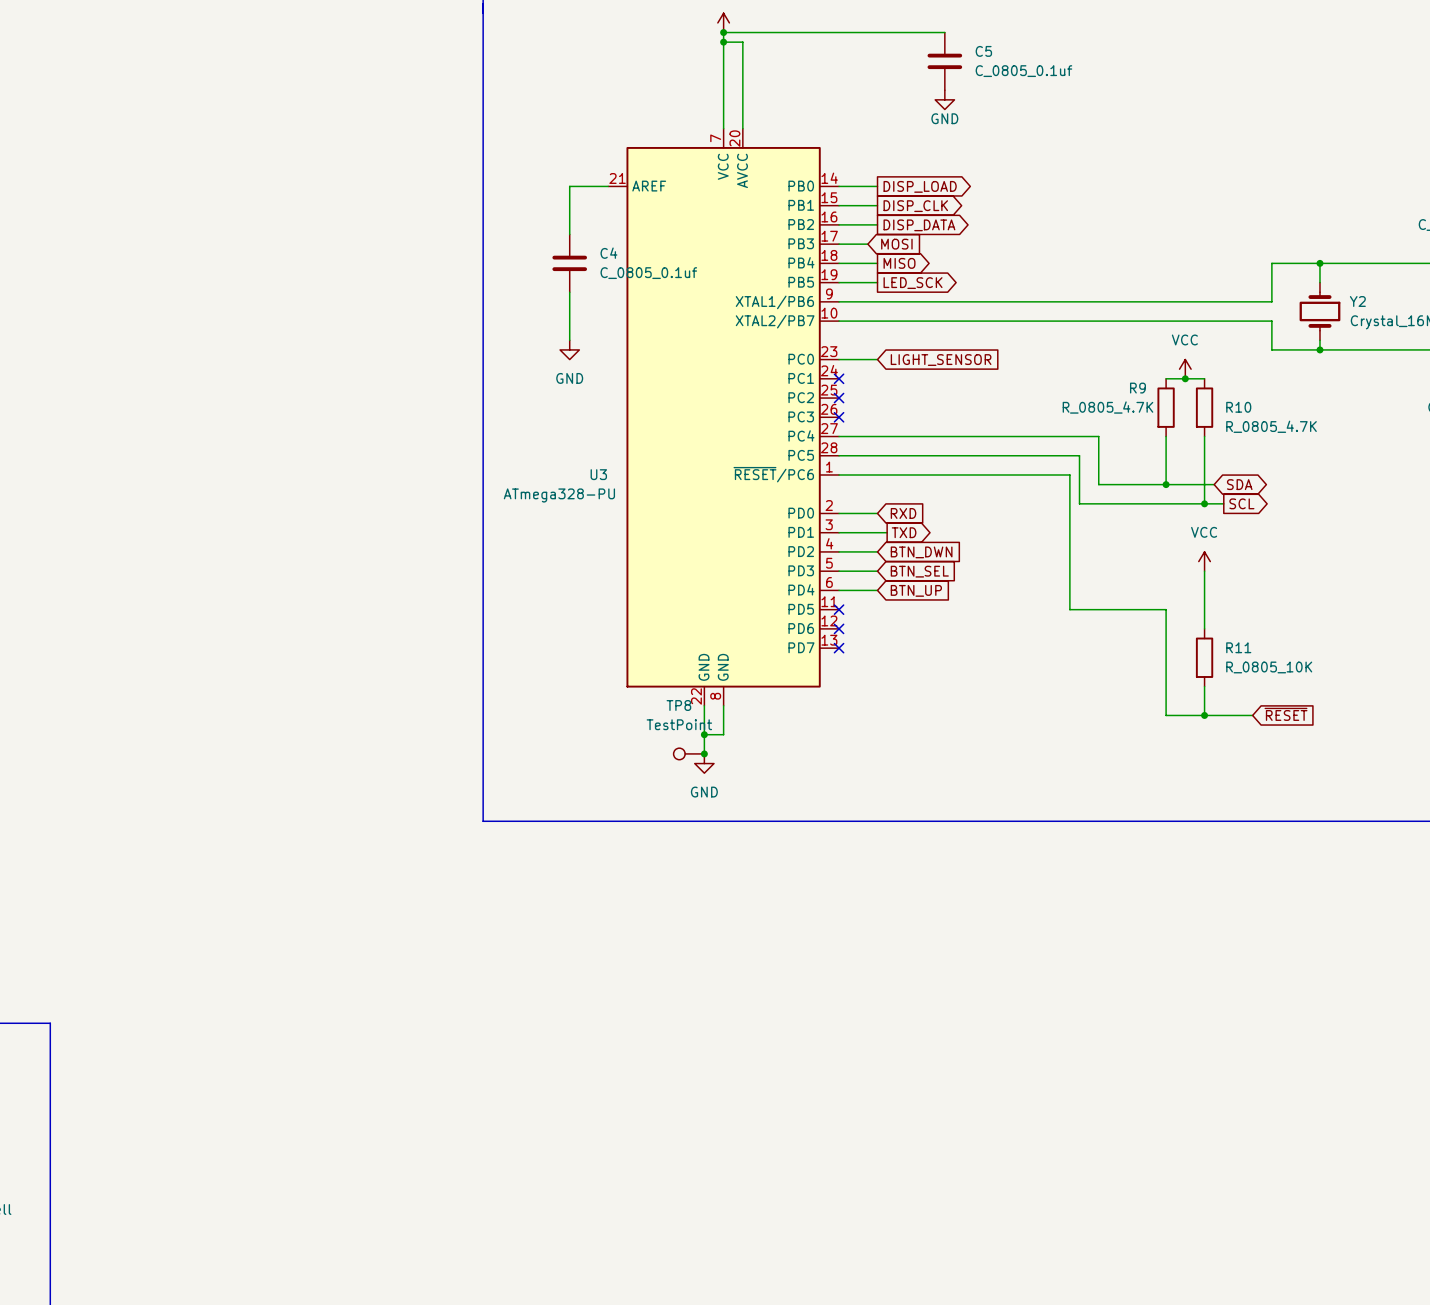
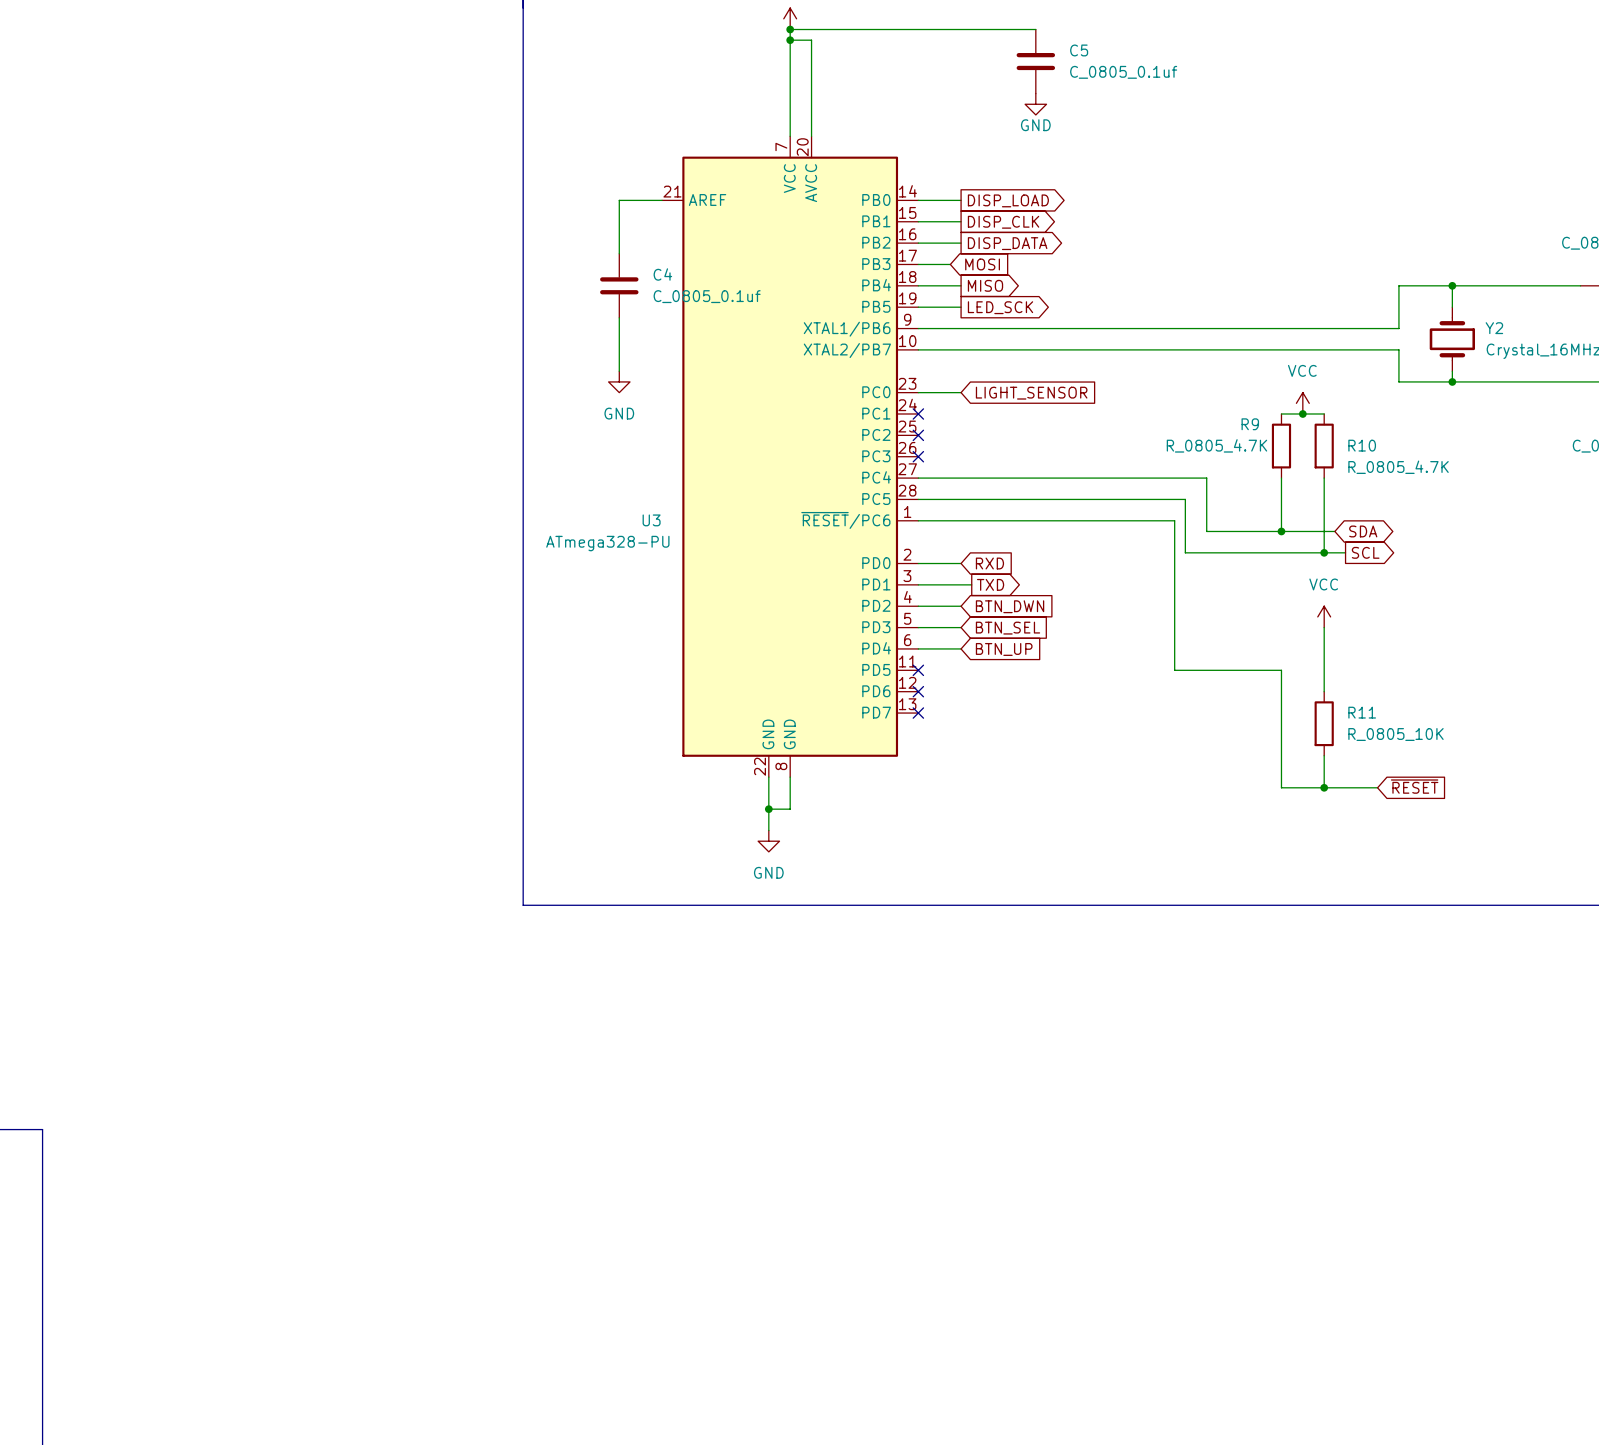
TP8: TestPoint (688, 753) -> none
junction: (704, 753) -> none

